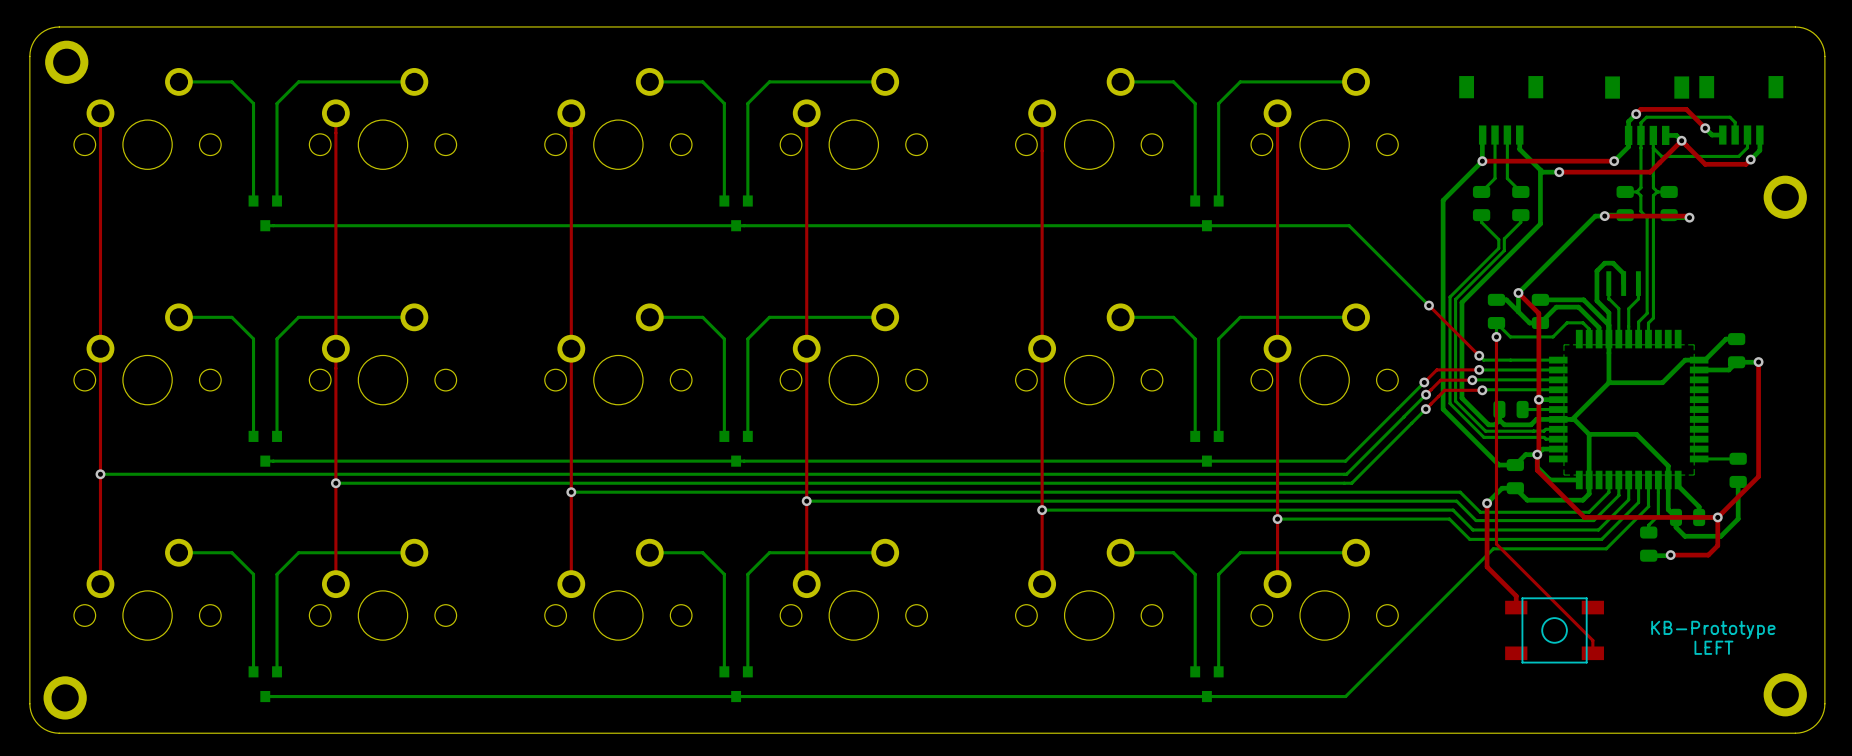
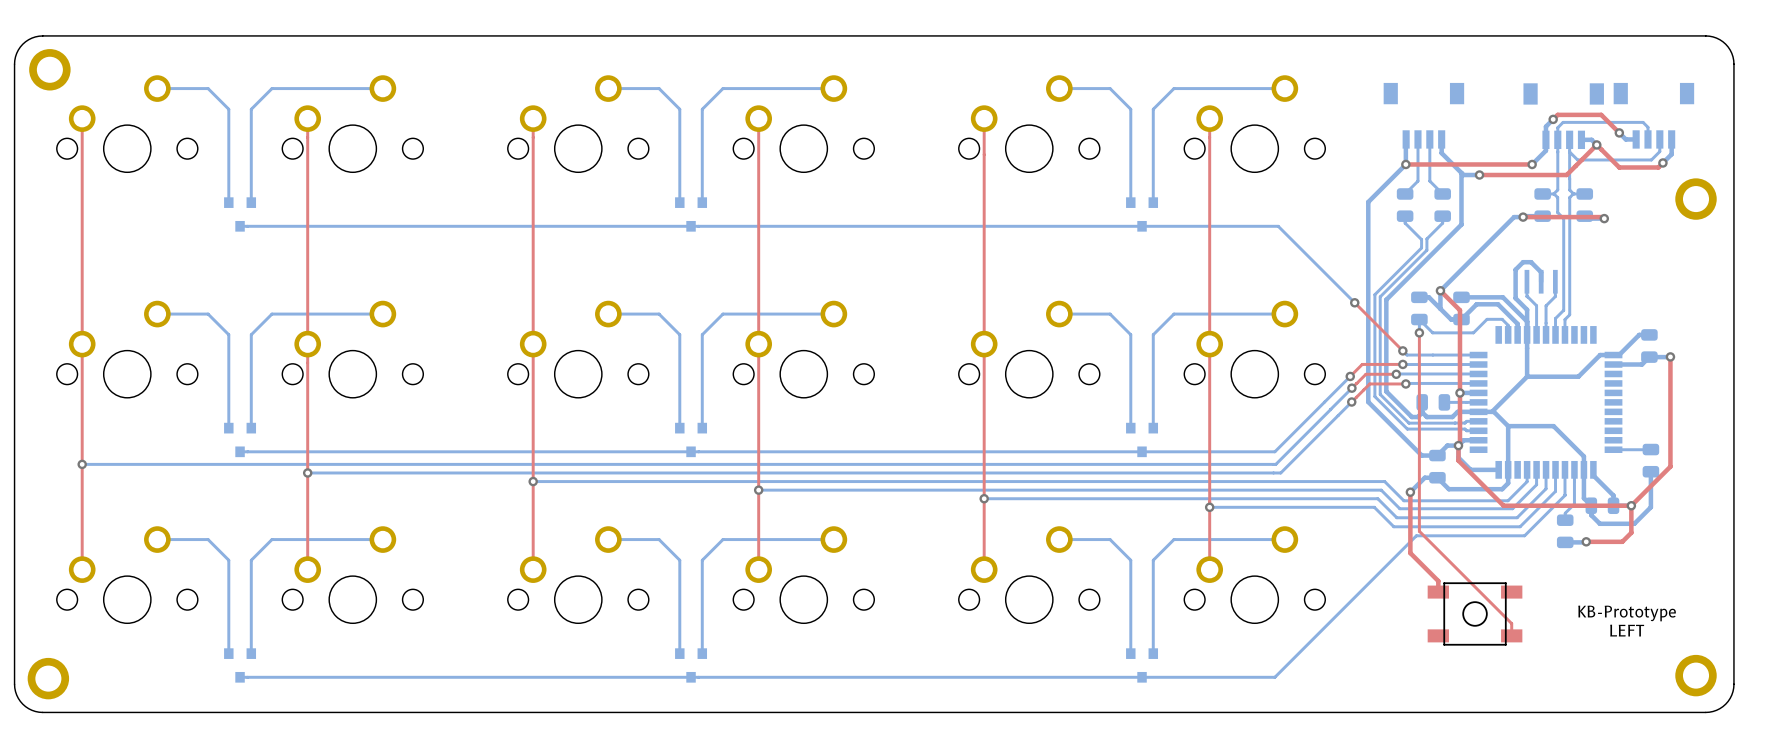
bottom zone outline: (1563, 344) (1563, 475) (1694, 475) (1694, 344) (1563, 344) -> none

